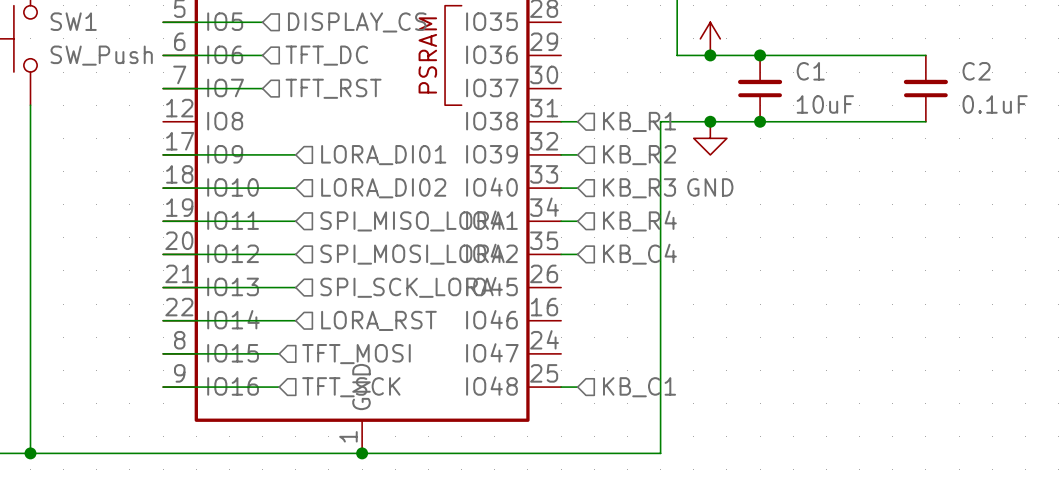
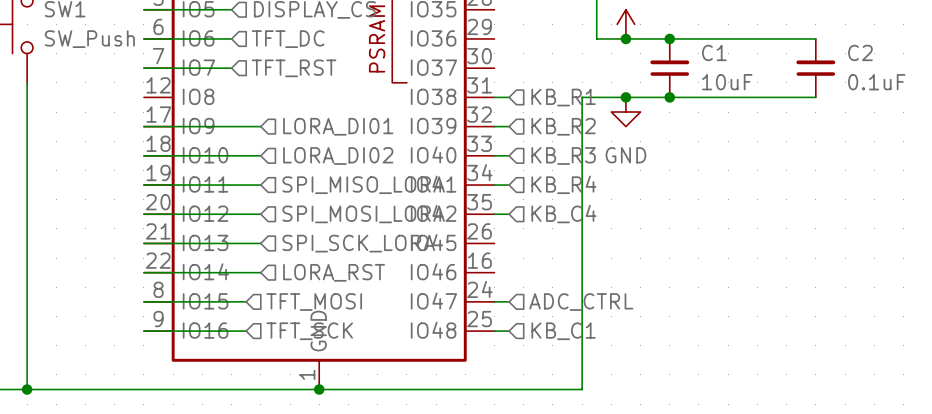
wire: none -> (494, 301) (509, 301)
hierarchical label: none -> ADC_CTRL (581, 302)

